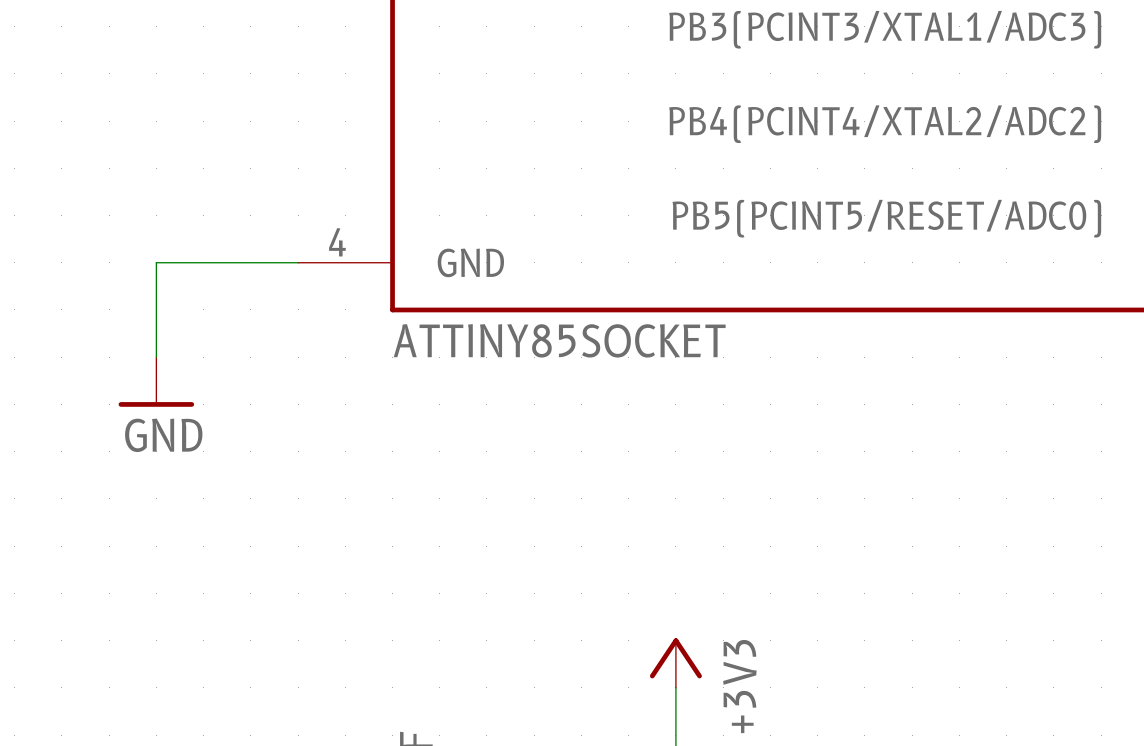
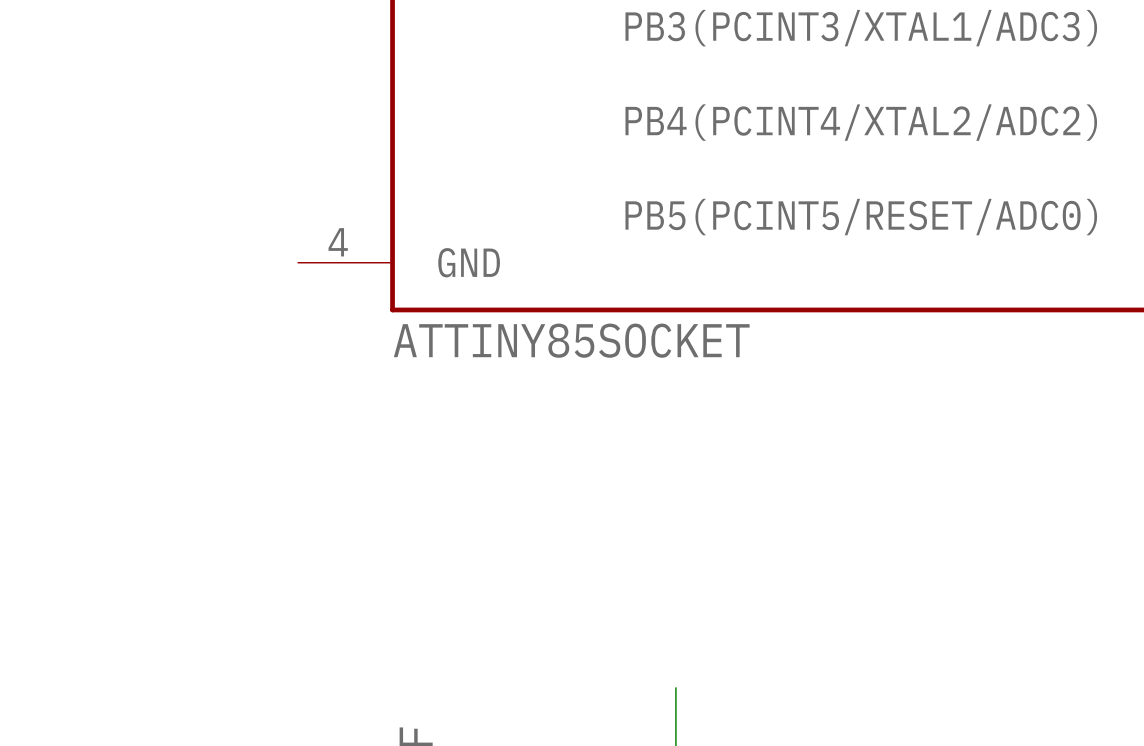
wire: (298, 262) (156, 262) (156, 357) -> none
power symbol: GND (156, 382) -> none
power symbol: +3V3 (675, 663) -> none

